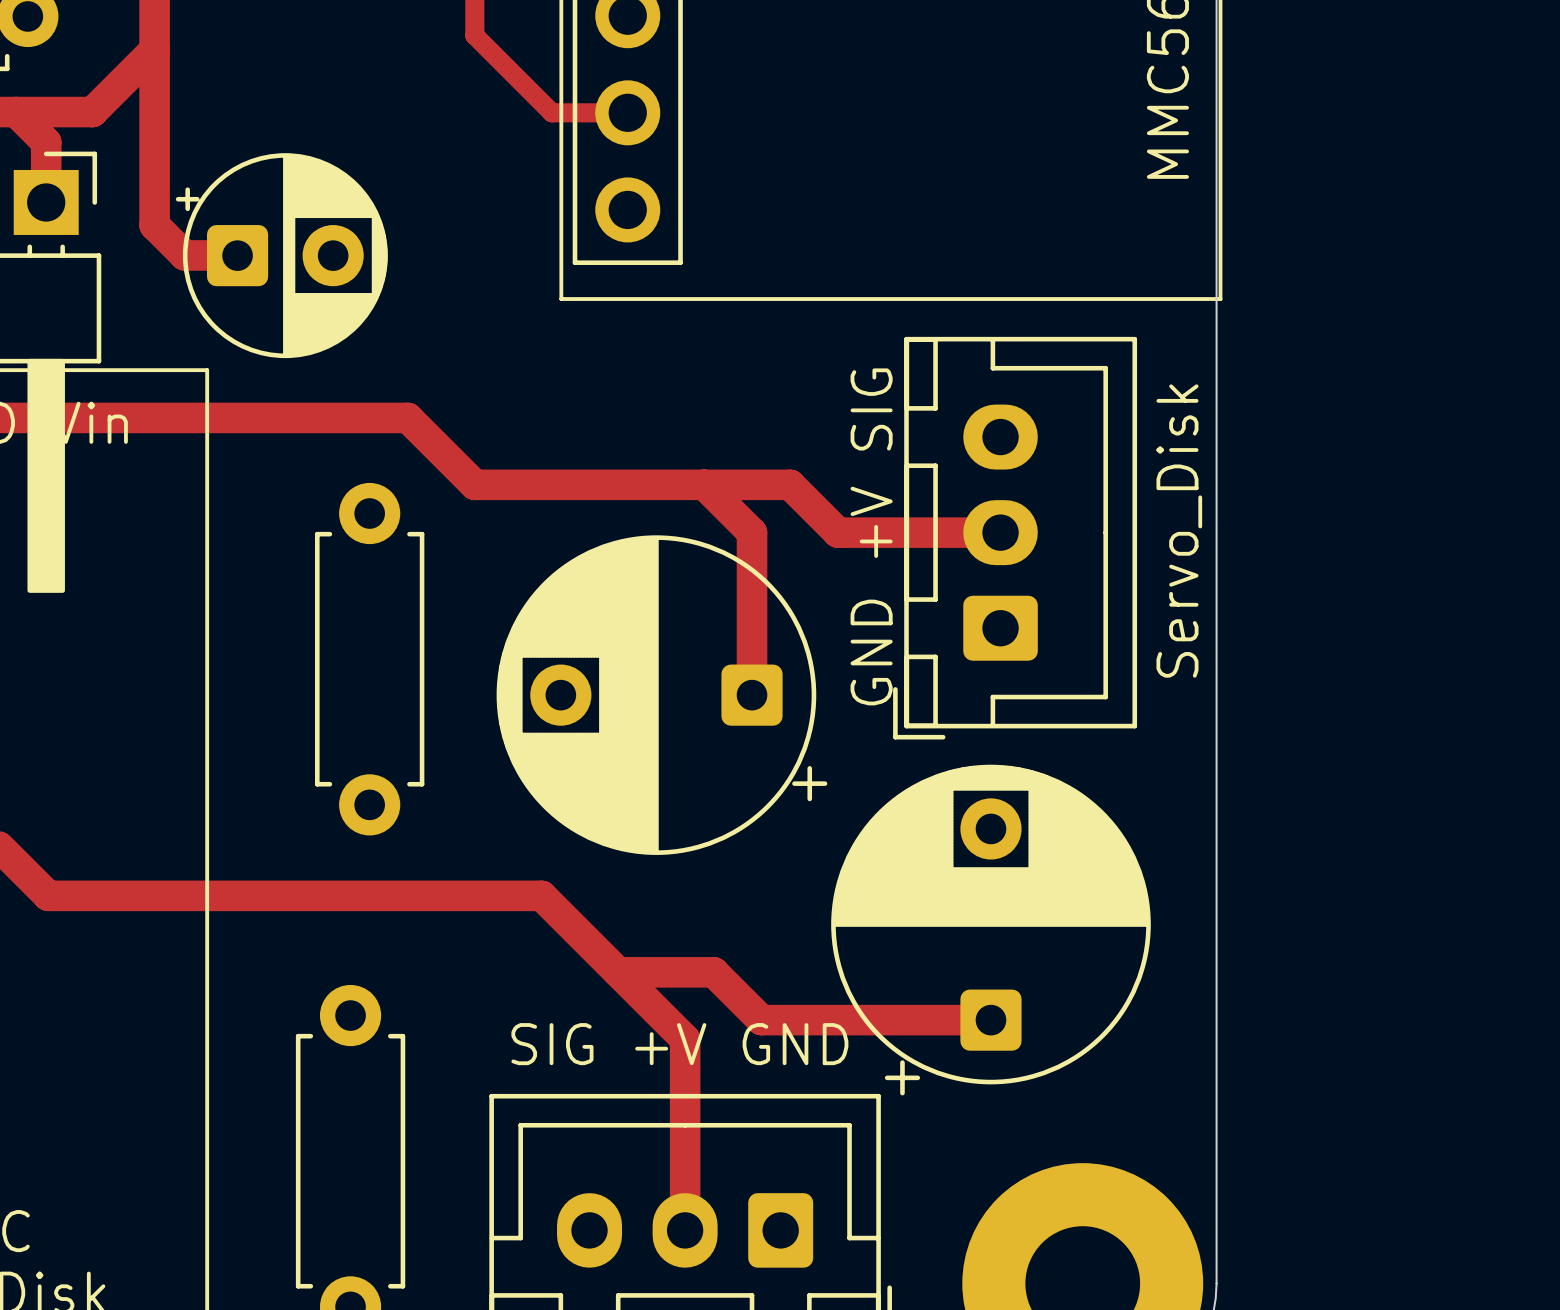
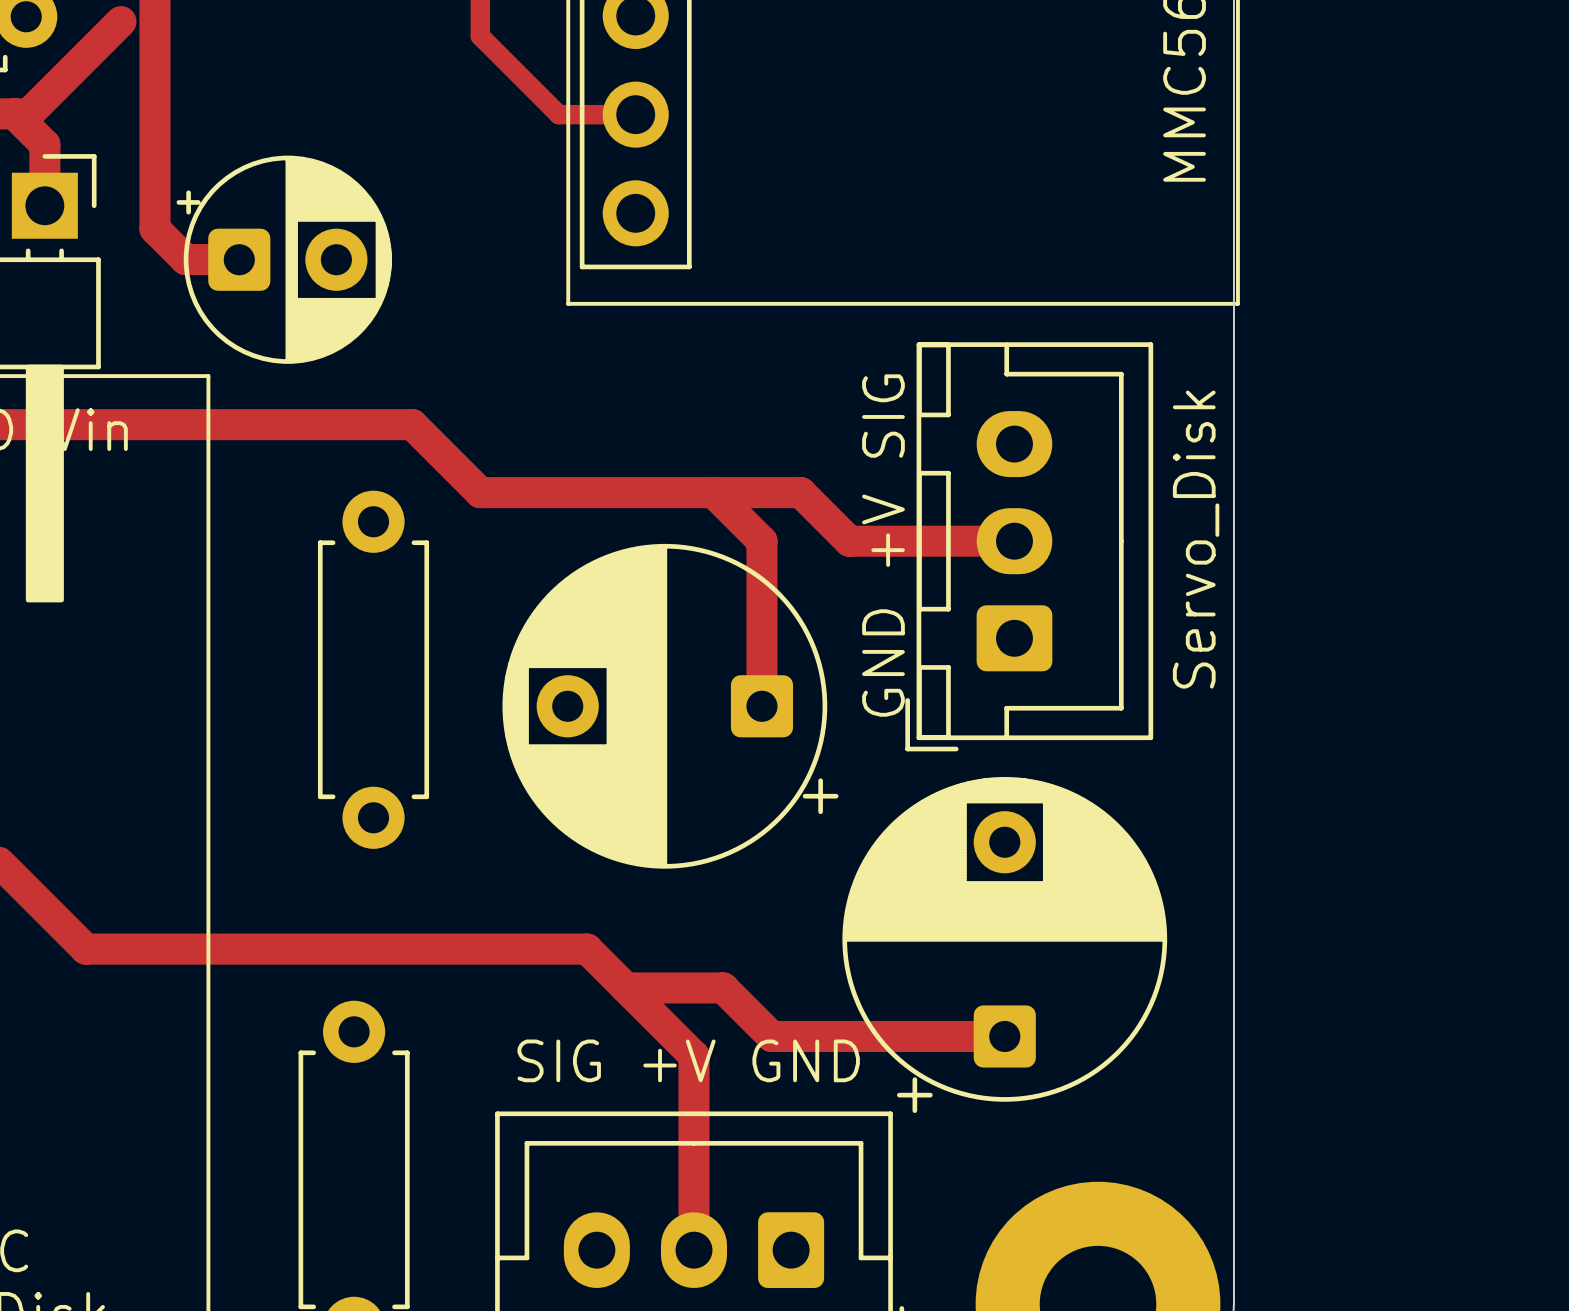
track: (154, 49) (92, 112) (30, 112) -> (121, 21) (28, 113)
track: (48, 895) (541, 895) (579, 934) -> (47, 910) (85, 949) (587, 949)

